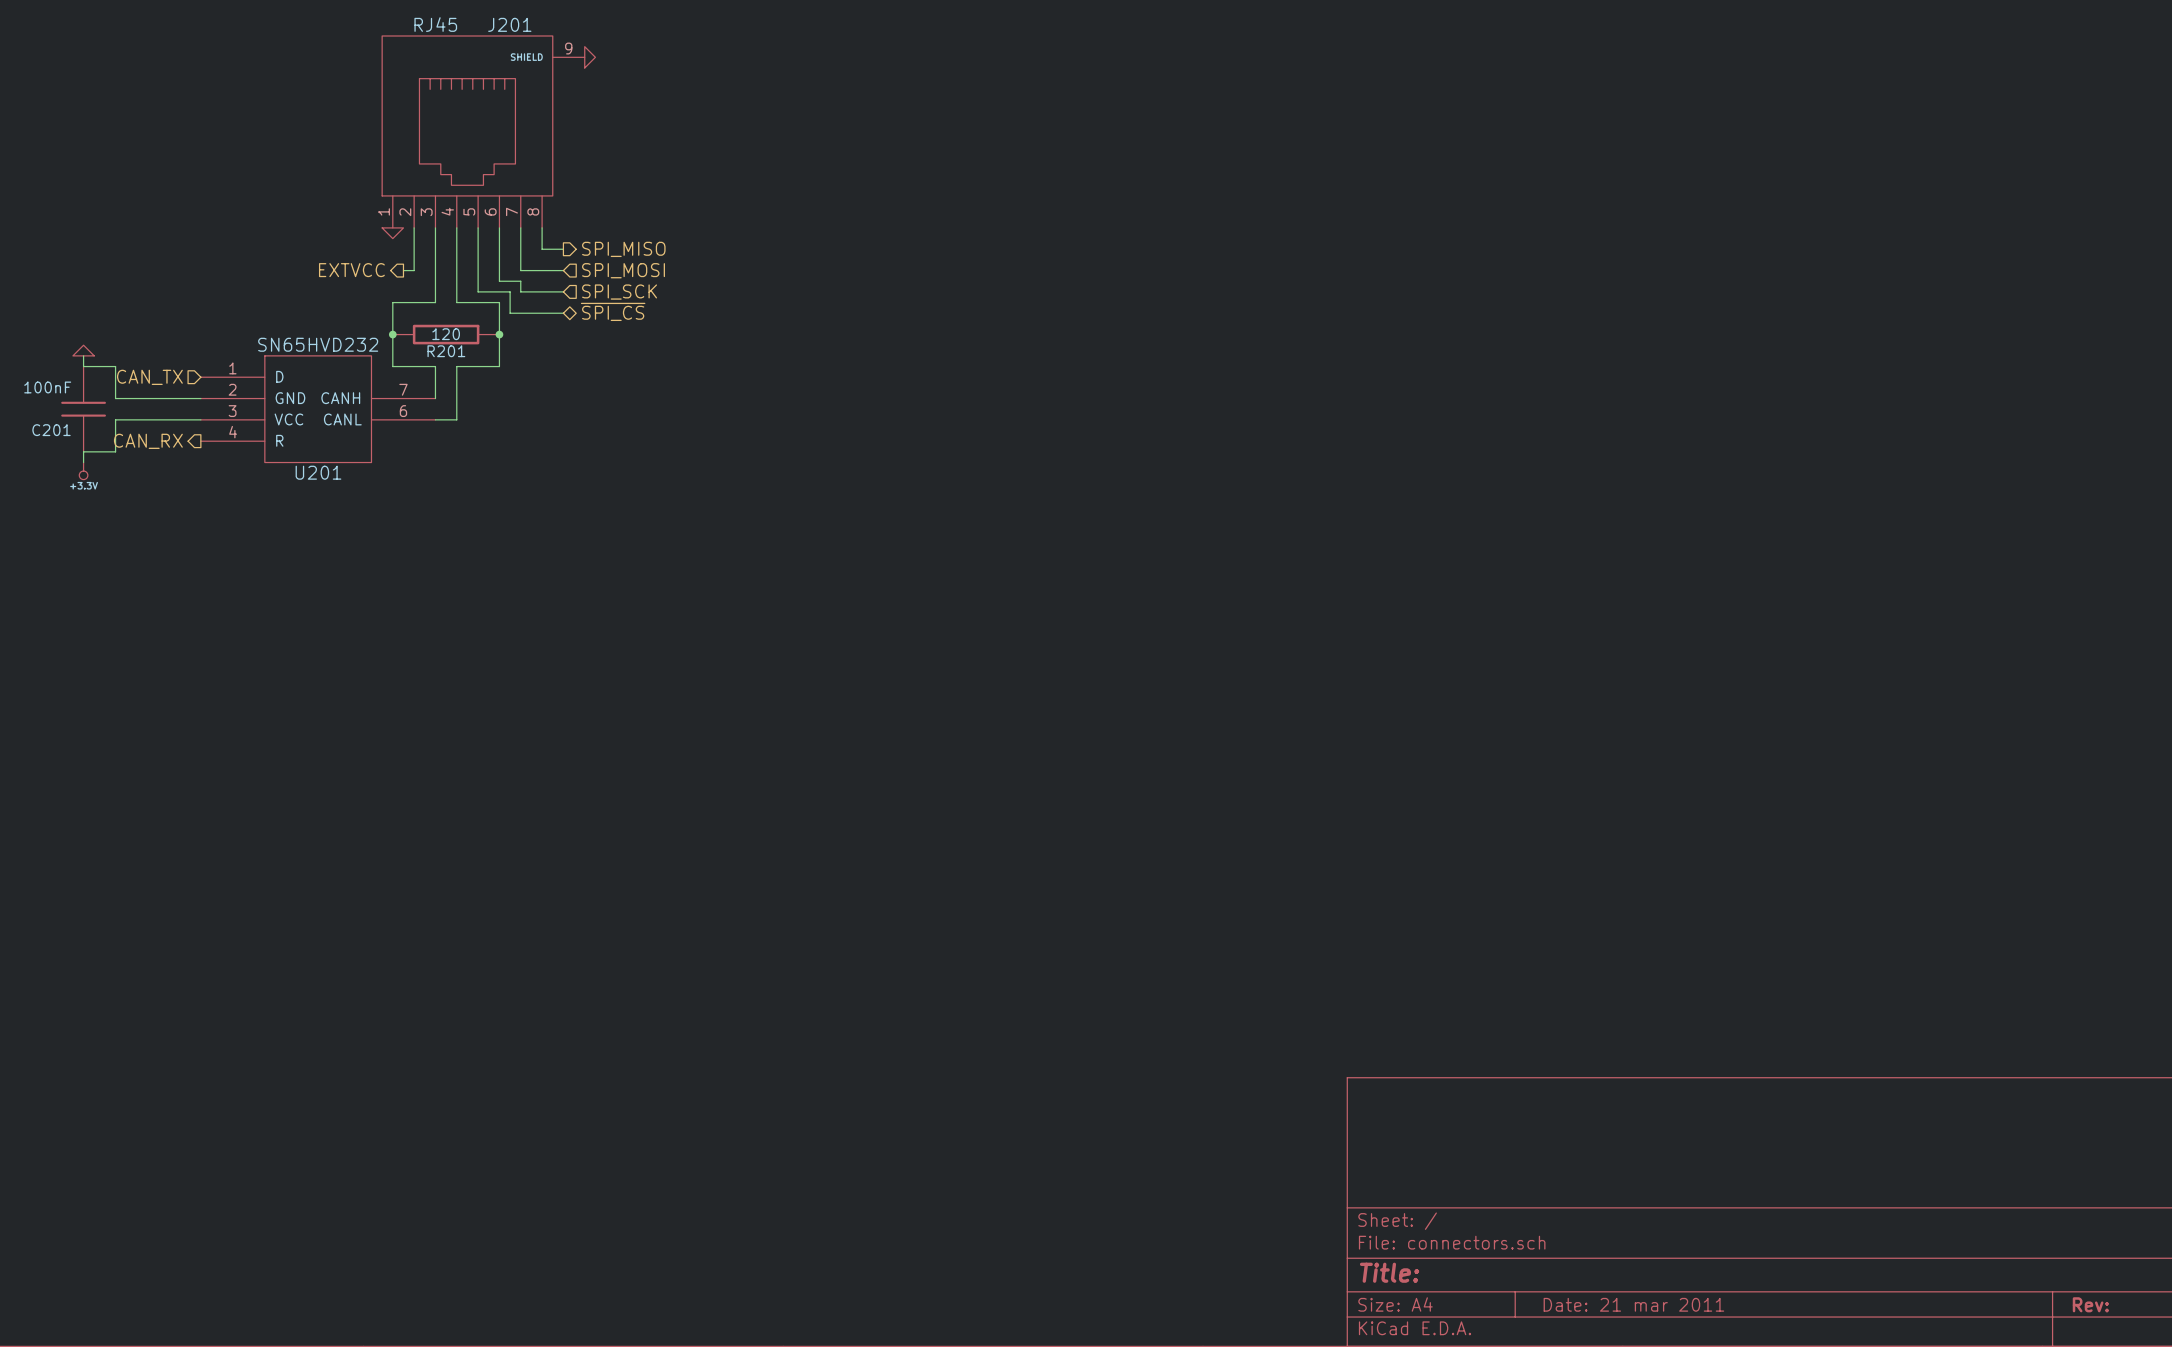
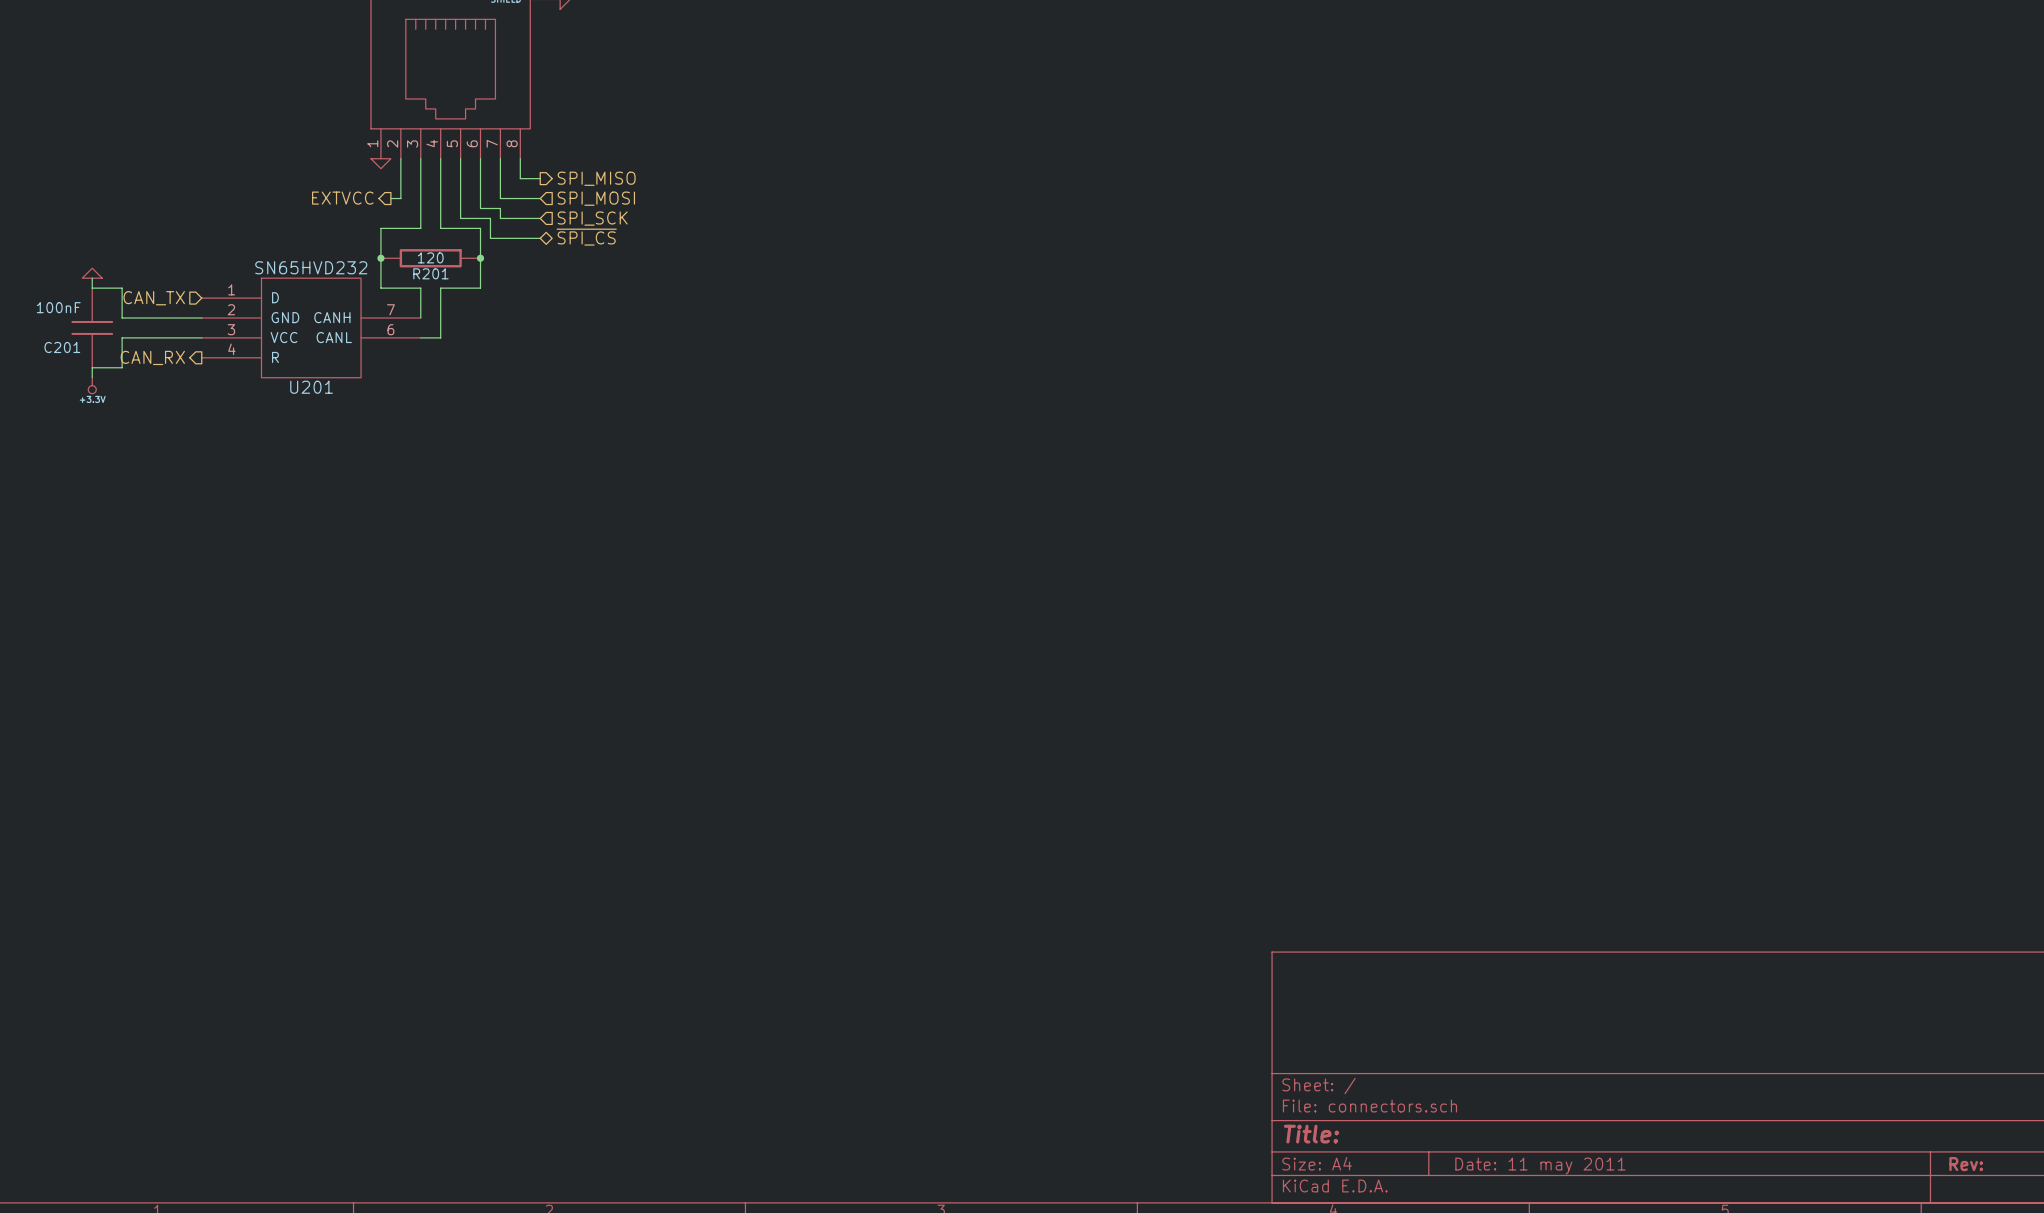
title block: Date: 21 mar 2011 (1633, 1304) -> Date: 11 may 2011 (1540, 1166)

